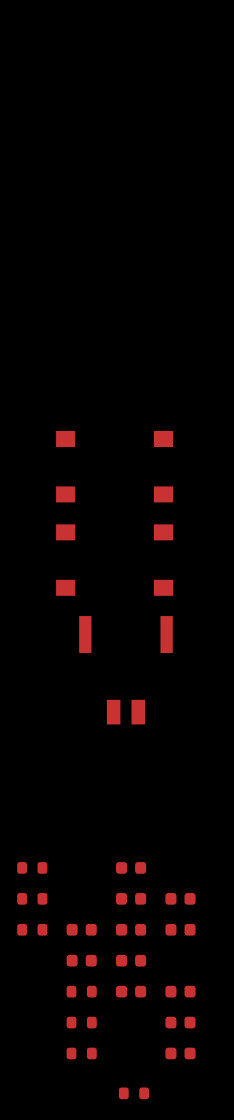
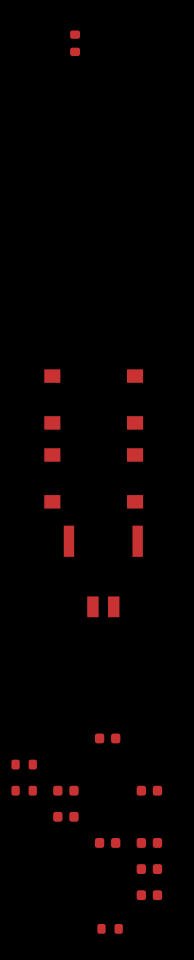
part: none -> (75, 43)
part: (32, 867) -> none
part: (131, 898) -> none
part: (180, 898) -> none
part: (131, 929) -> none
part: (131, 960) -> none
part: (81, 991) -> none
part: (81, 1022) -> none
part: (81, 1053) -> none

